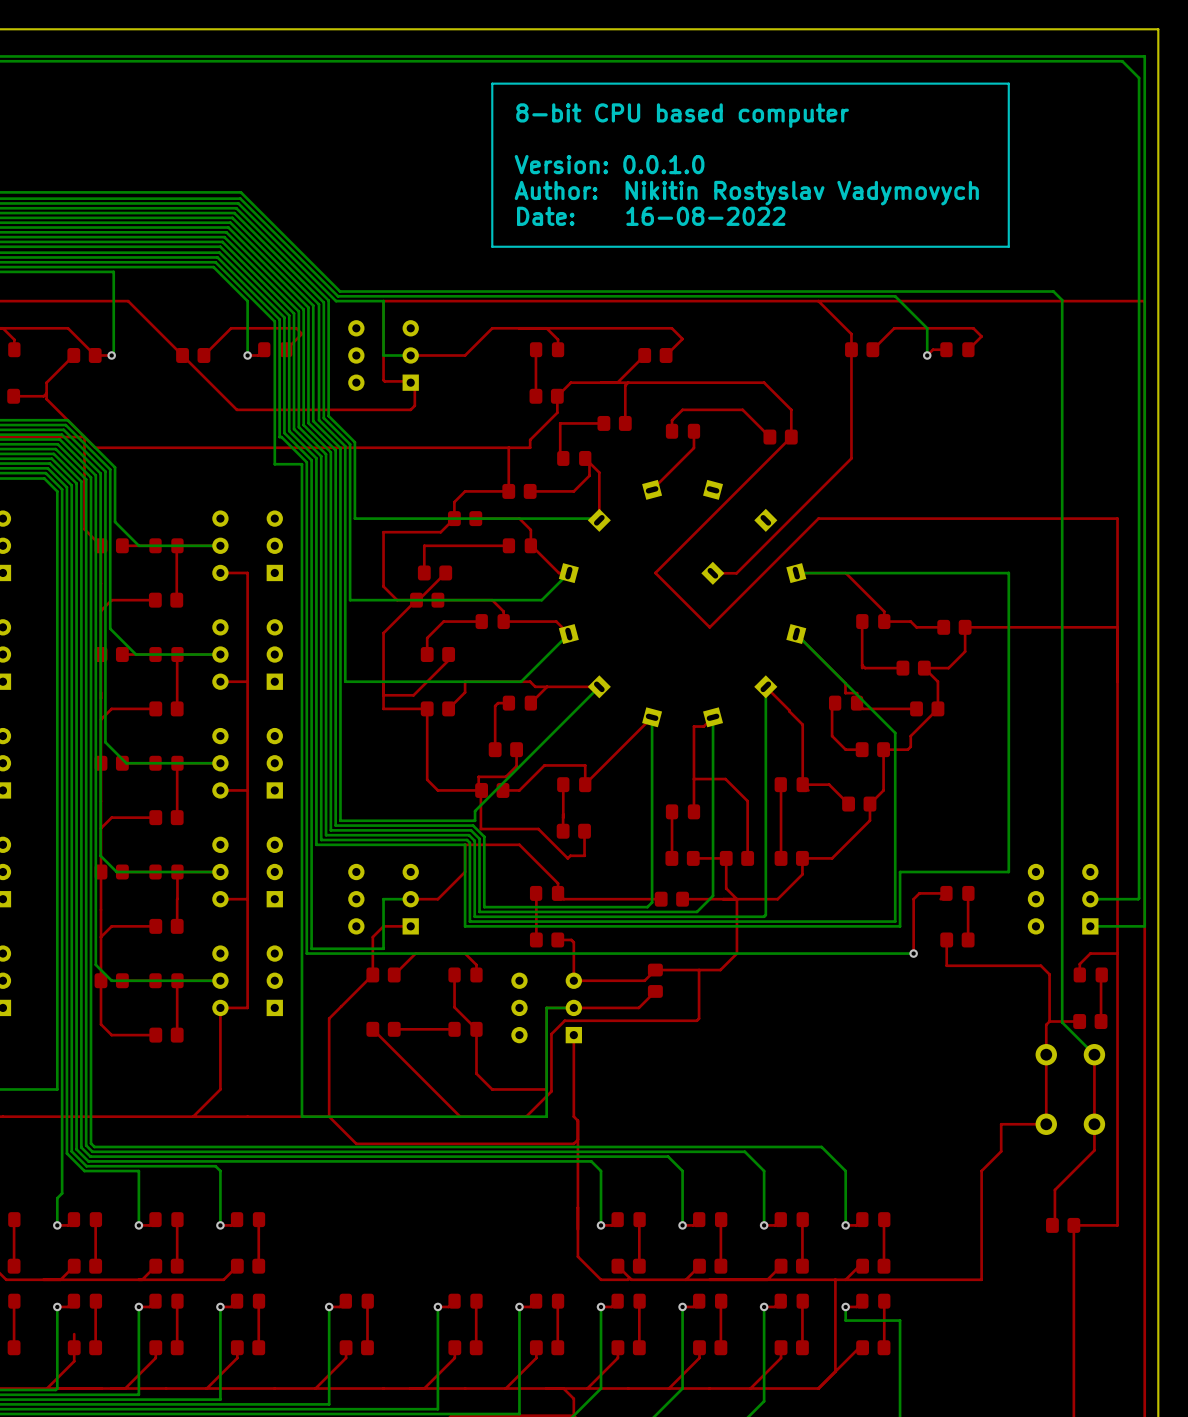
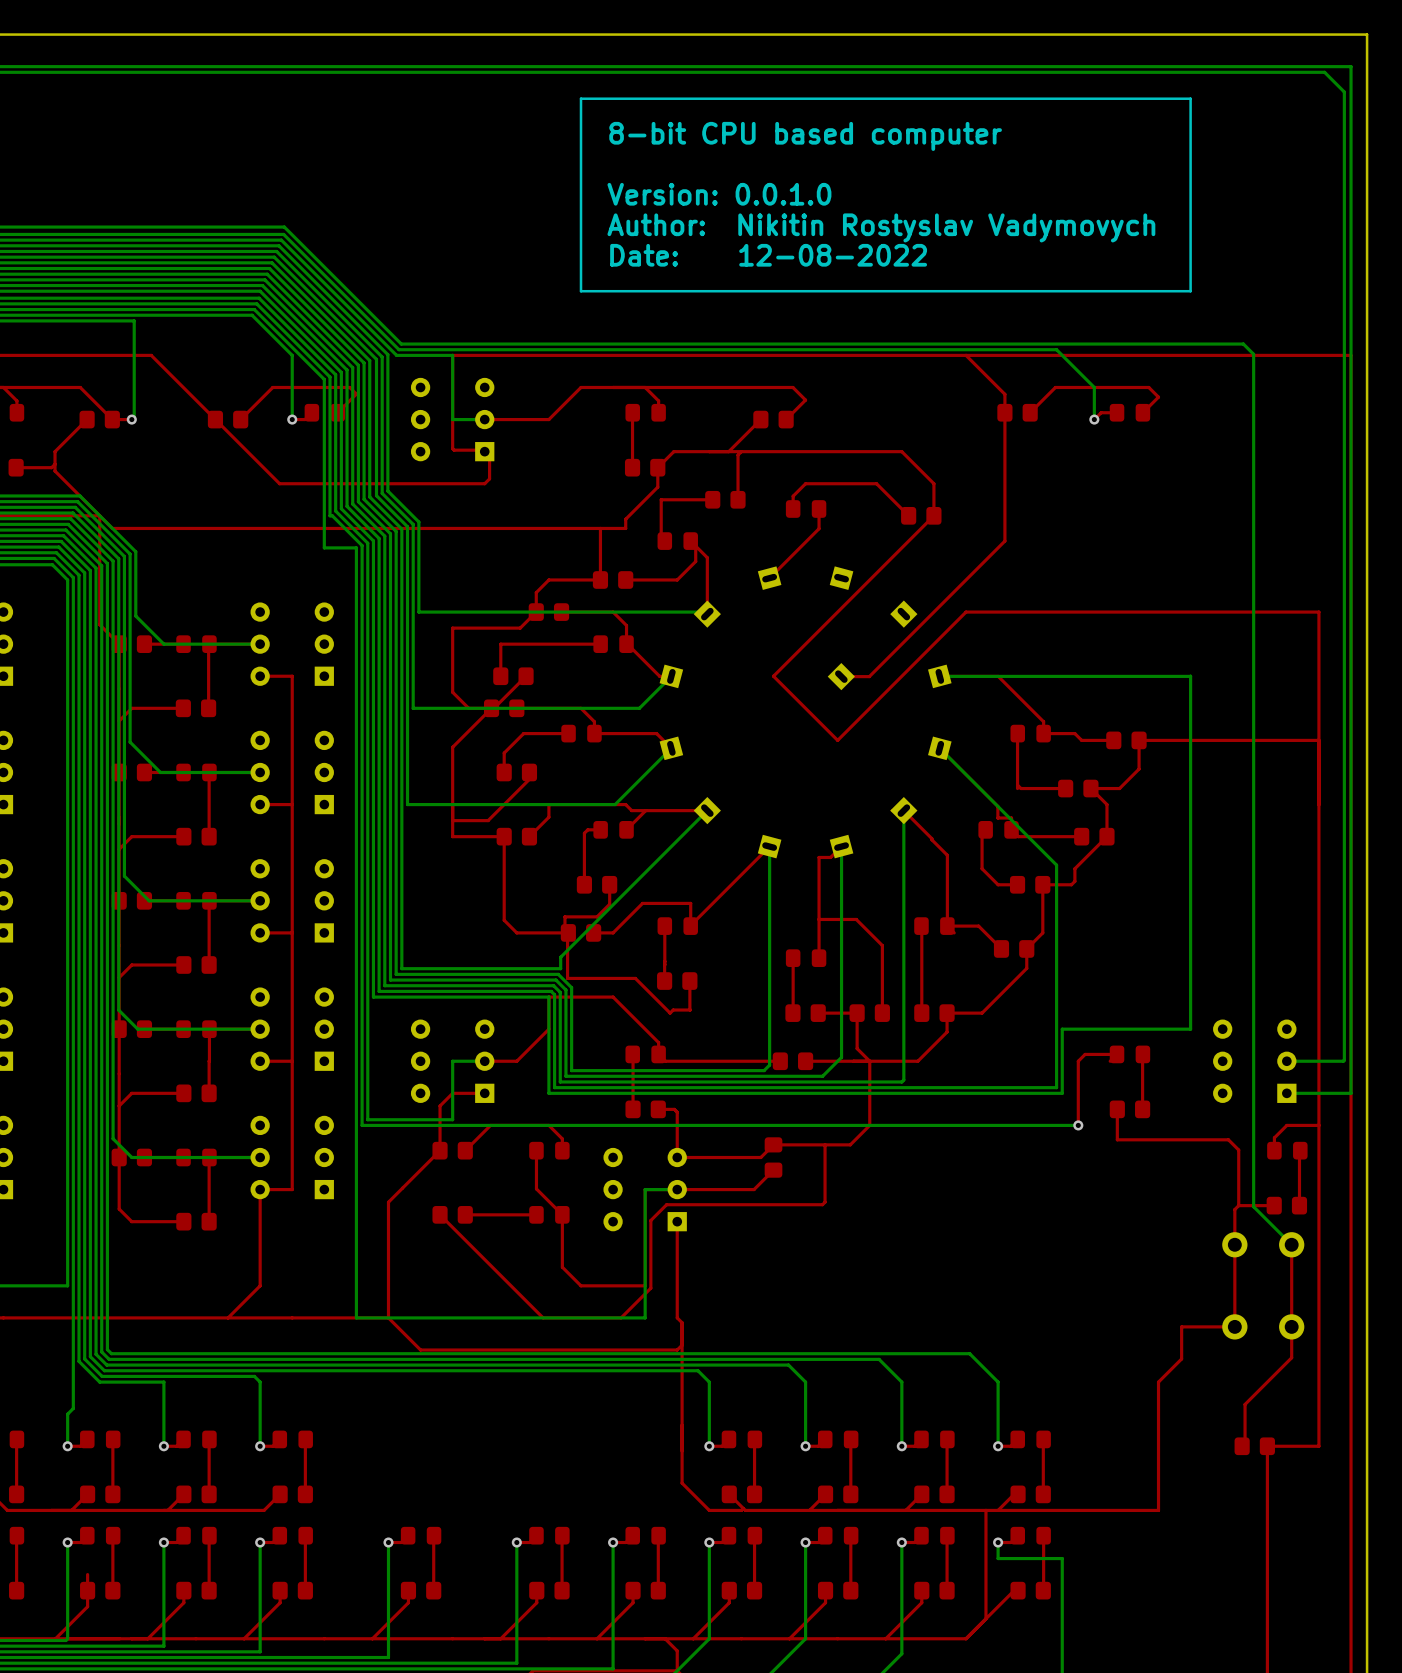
text: Date: 16-08-2022 (651, 216) -> Date: 12-08-2022 (768, 255)

